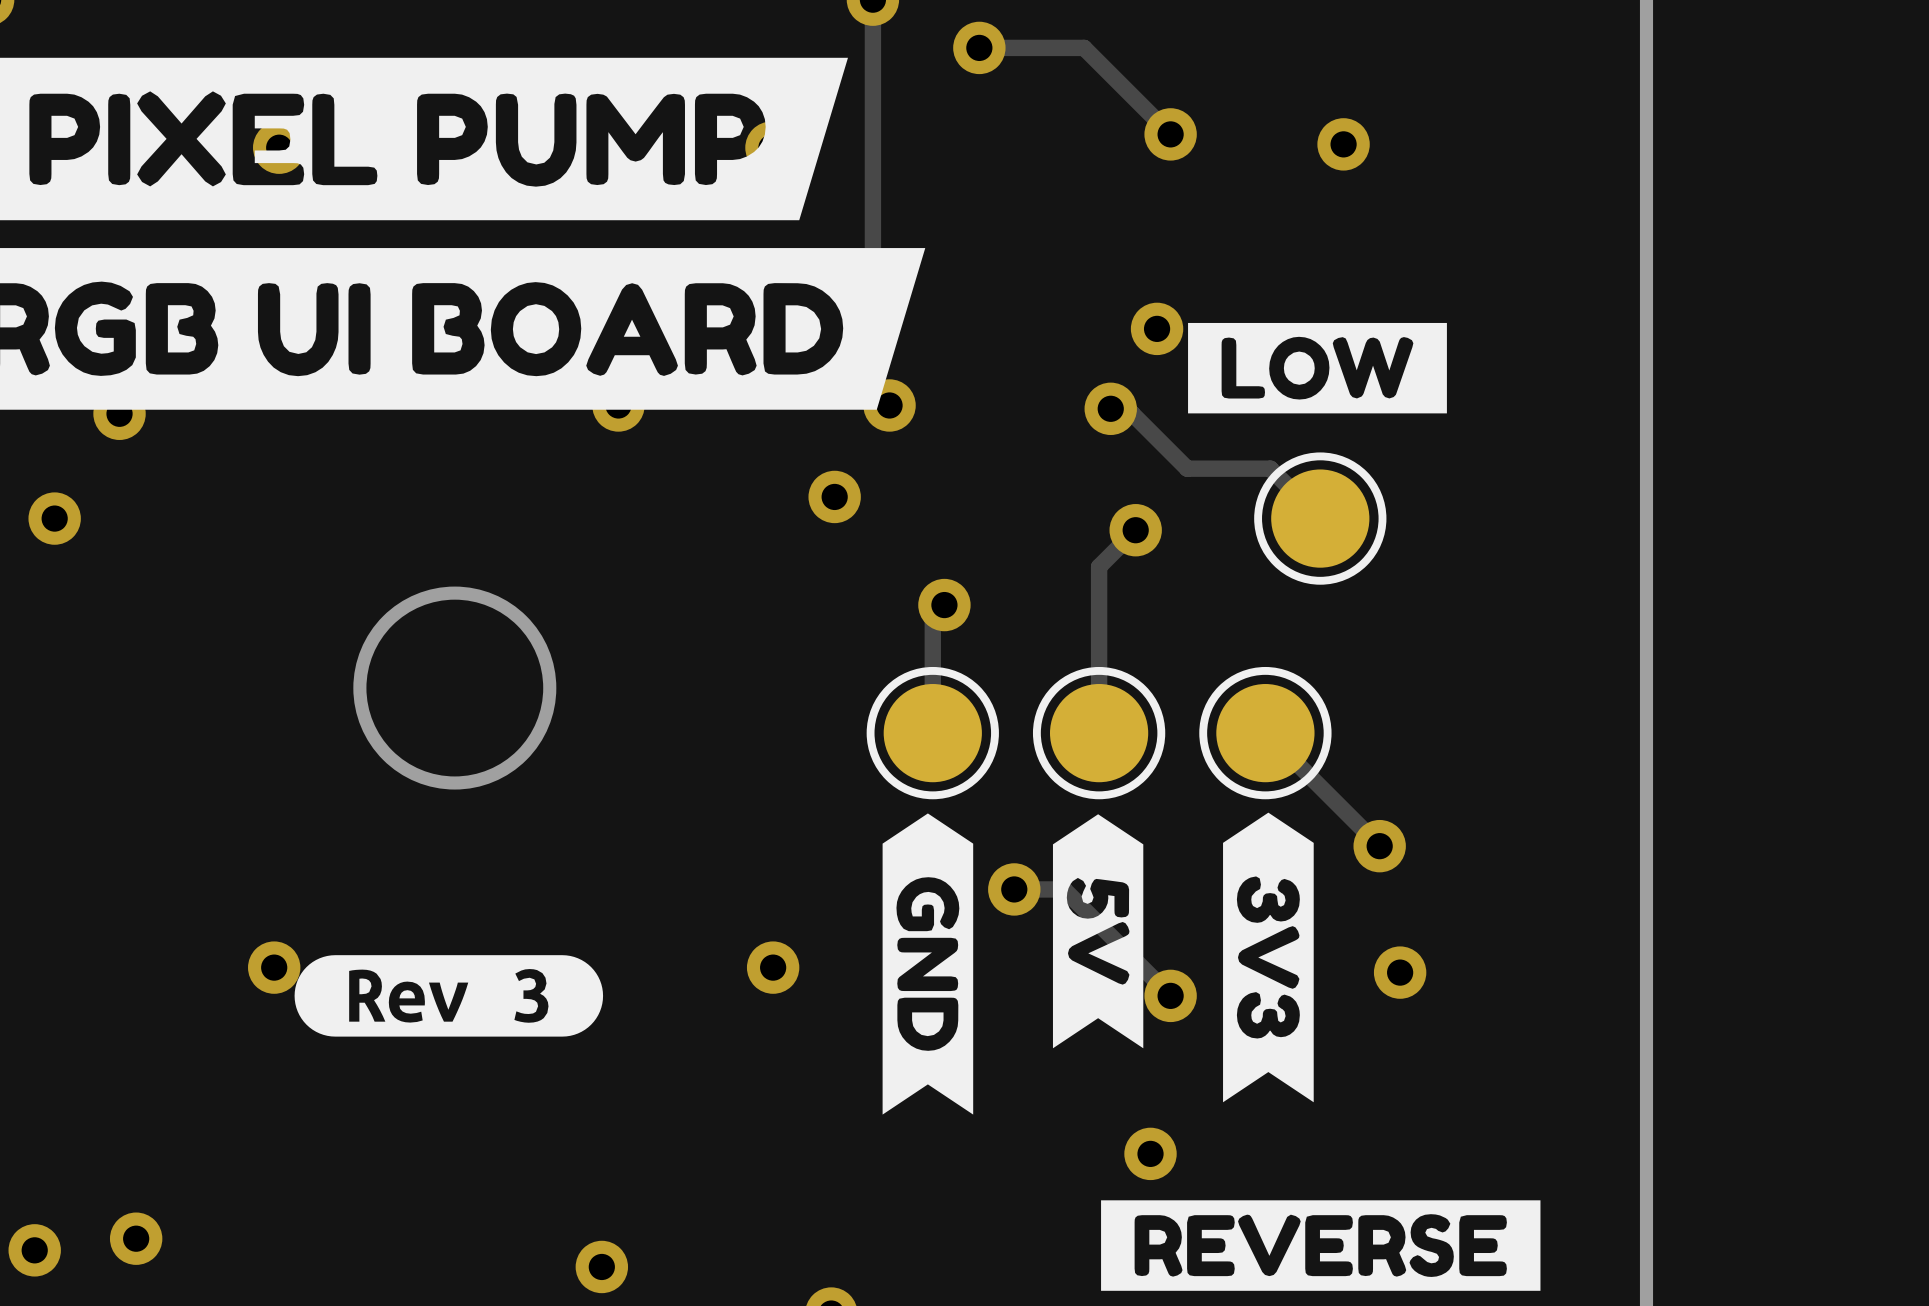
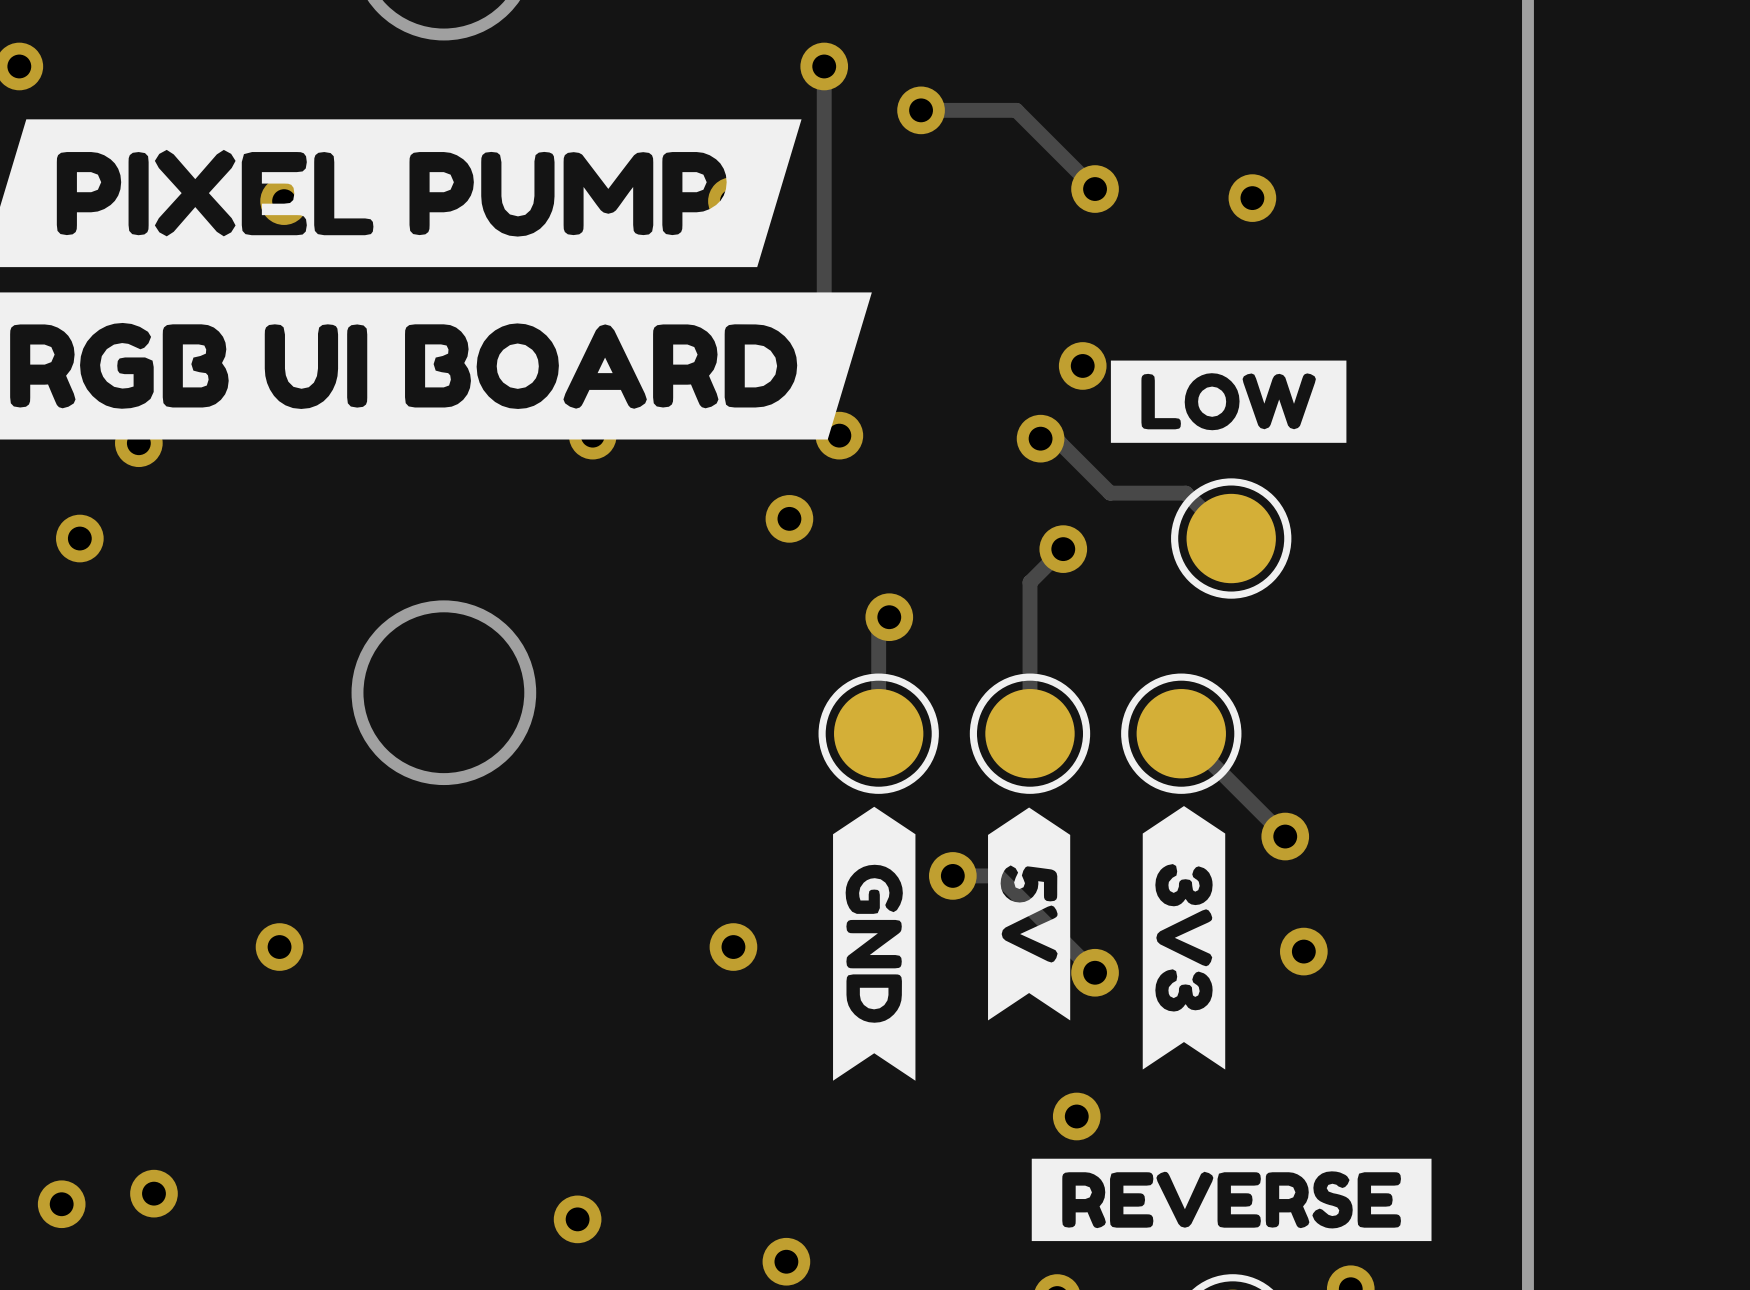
drawing: [294, 955, 604, 1037] -> none

